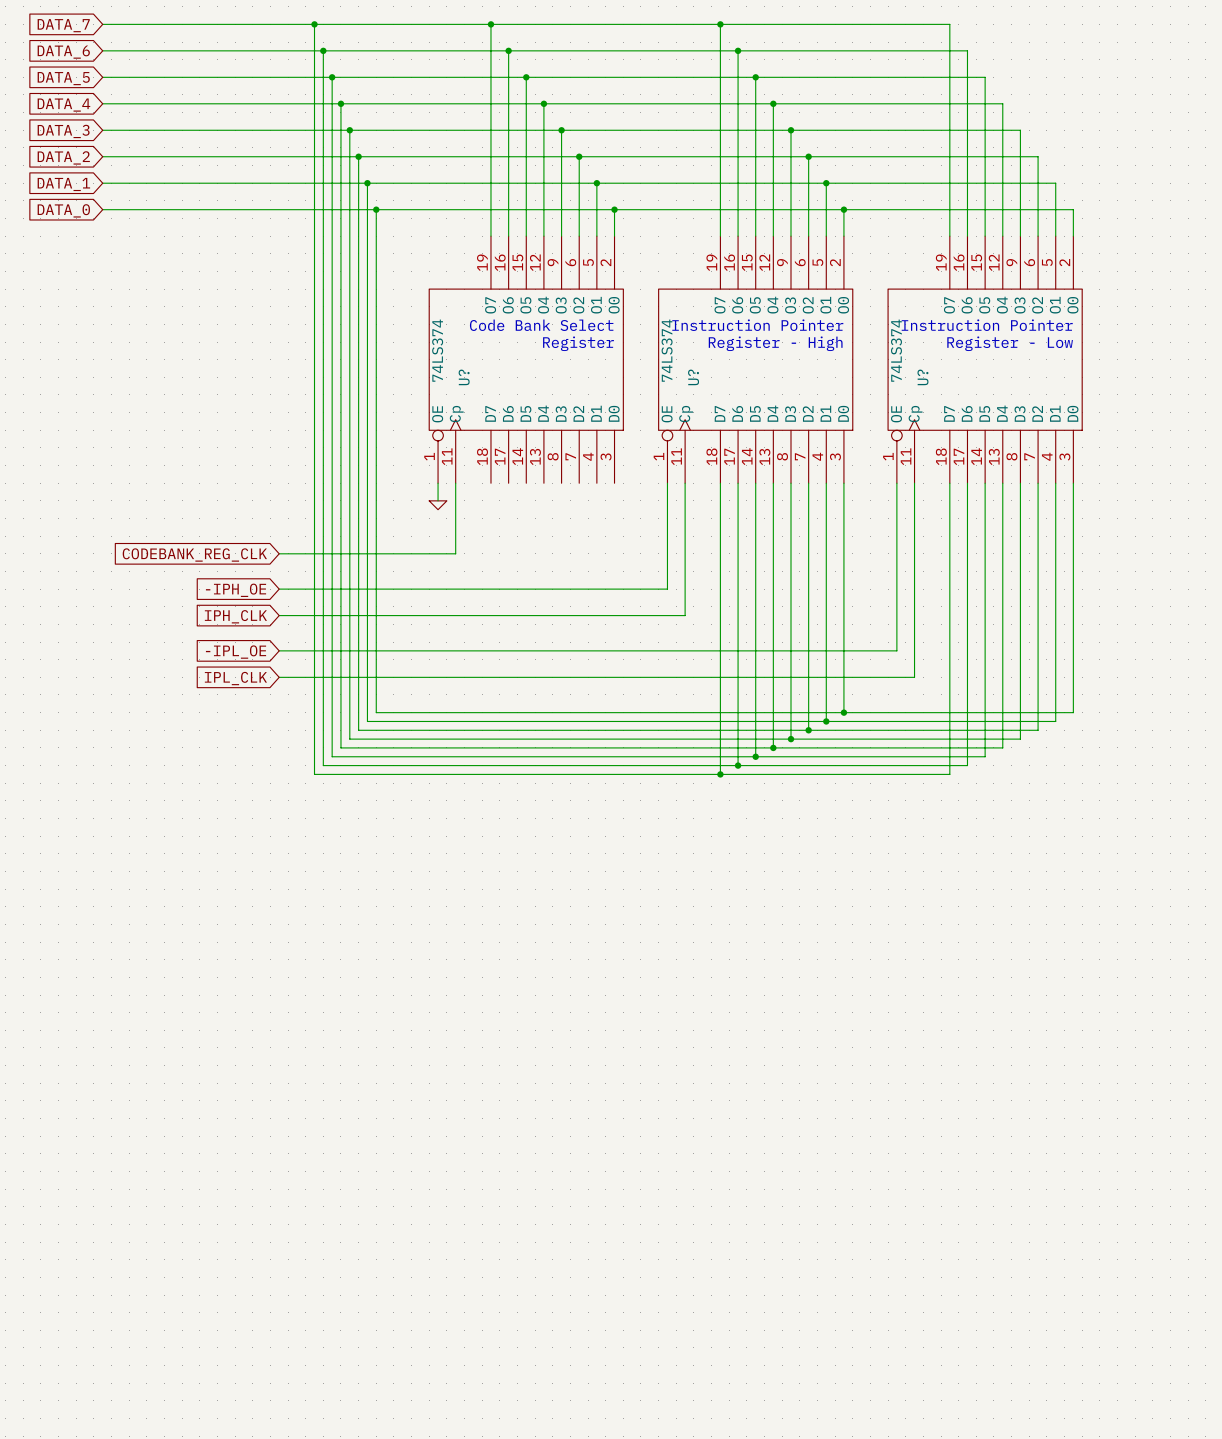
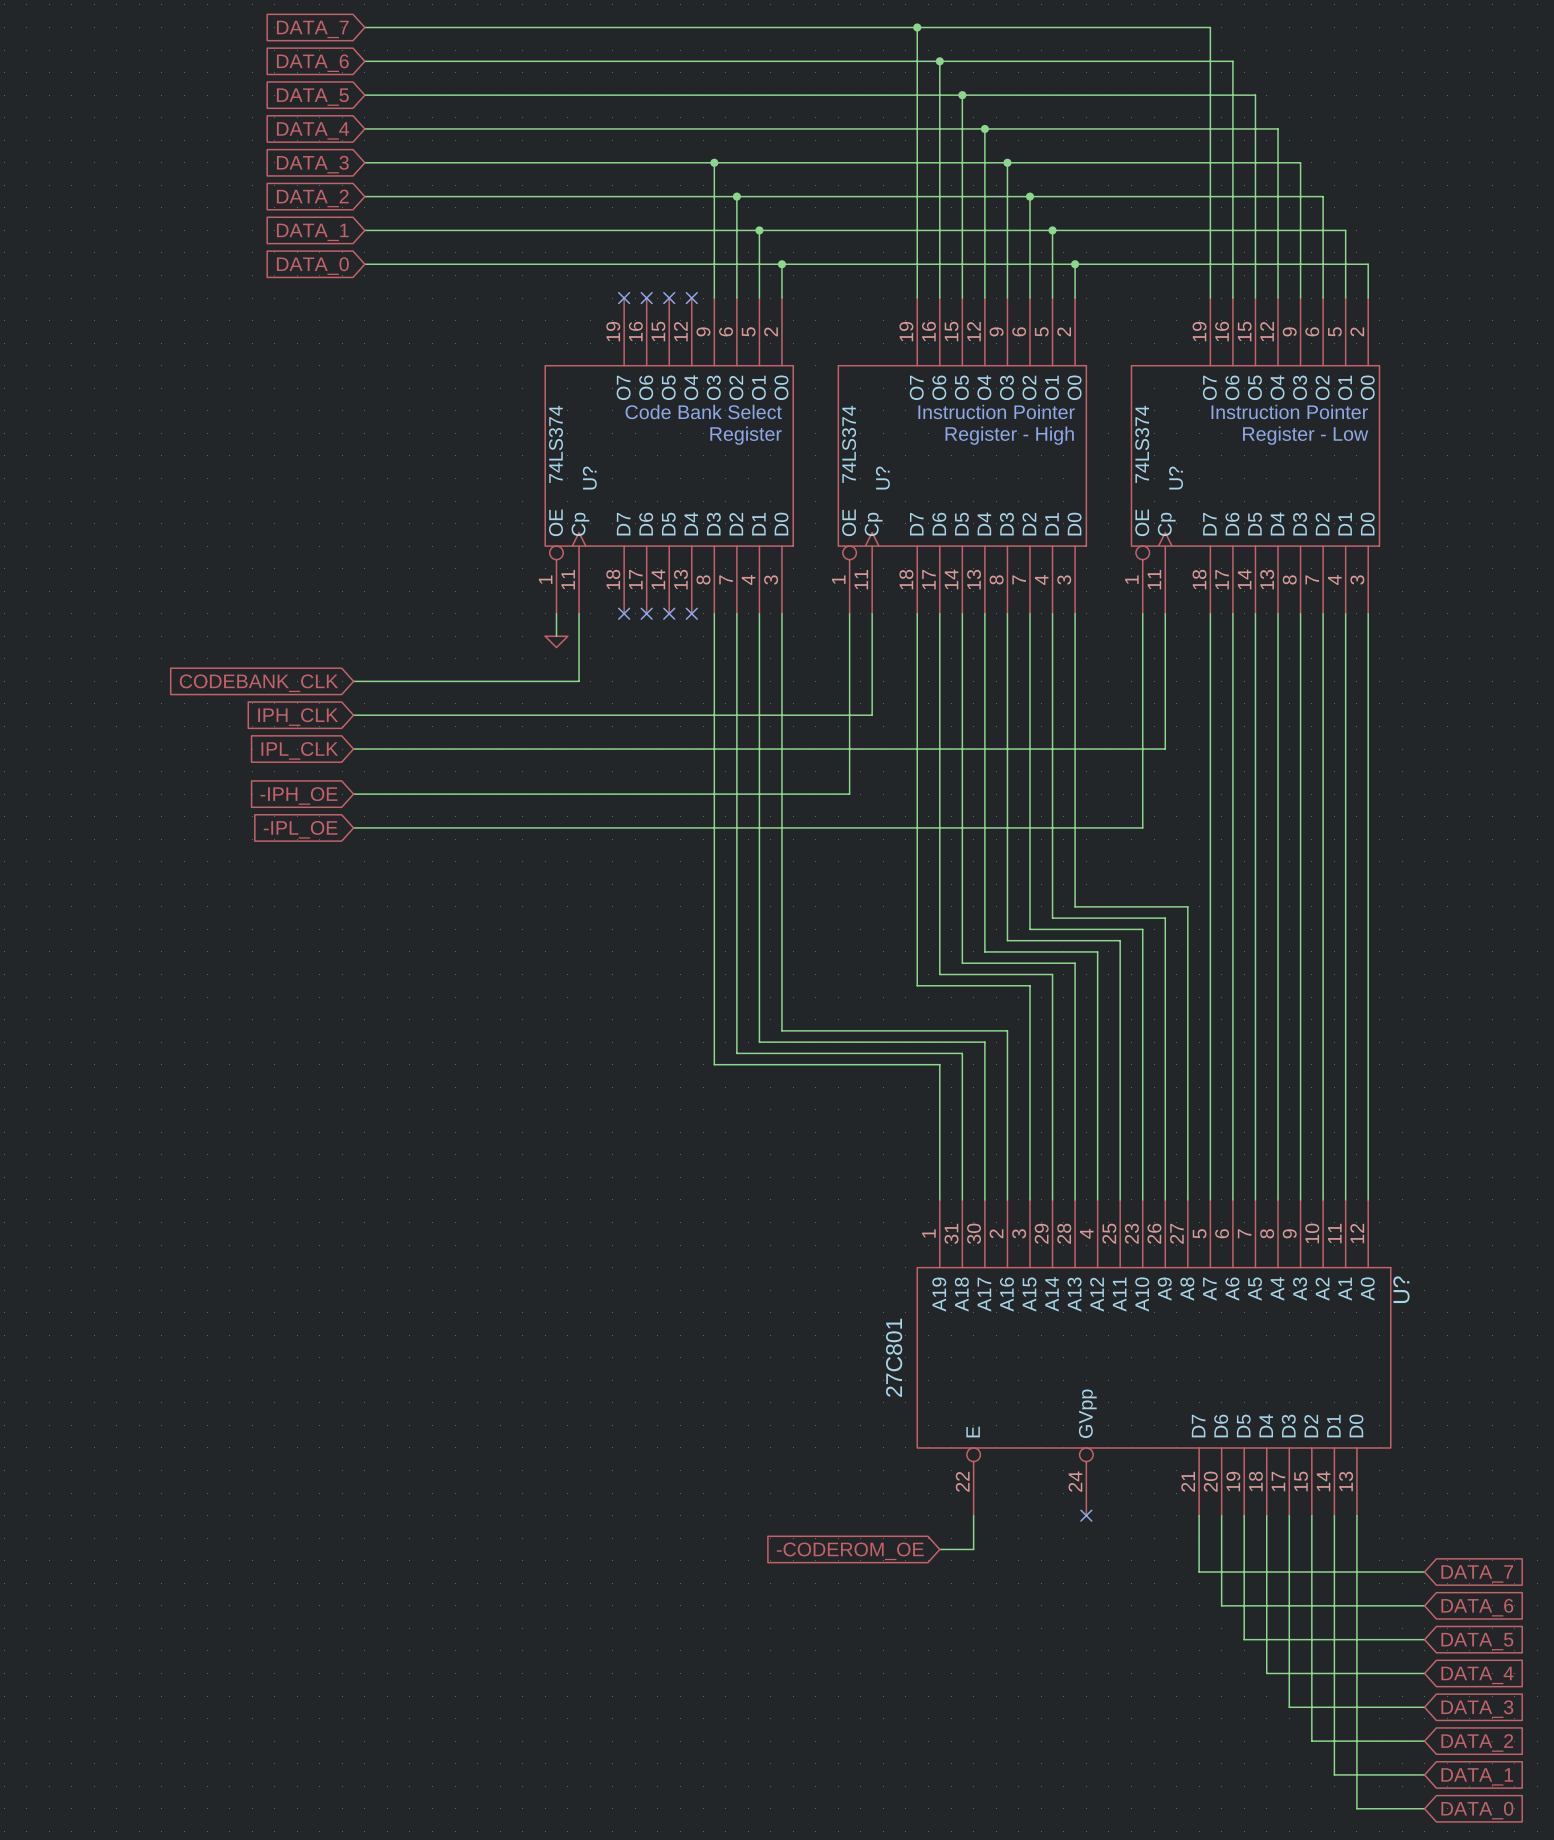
wire: (102, 24) (288, 24) -> none
wire: (314, 24) (314, 774) (720, 774) -> none
junction: (314, 24) -> none
wire: (490, 24) (490, 236) -> none
junction: (490, 24) -> none
global label: DATA_7 (63, 25) -> none
global label: none -> DATA_7 (312, 29)
wire: (102, 50) (288, 50) -> none
wire: (323, 50) (323, 765) (738, 765) -> none
junction: (323, 50) -> none
wire: (508, 50) (508, 236) -> none
junction: (508, 50) -> none
global label: DATA_6 (63, 52) -> none
global label: none -> DATA_6 (312, 63)
wire: (102, 77) (288, 77) -> none
wire: (332, 77) (332, 756) (755, 756) -> none
junction: (332, 77) -> none
wire: (526, 77) (526, 236) -> none
junction: (526, 77) -> none
global label: DATA_5 (63, 78) -> none
global label: none -> DATA_5 (312, 97)
wire: (102, 103) (288, 103) -> none
wire: (340, 103) (340, 747) (773, 747) -> none
junction: (340, 103) -> none
wire: (543, 103) (543, 236) -> none
junction: (543, 103) -> none
global label: DATA_4 (63, 105) -> none
global label: none -> DATA_4 (312, 130)
wire: (102, 130) (288, 130) -> none
wire: (349, 130) (349, 739) (791, 739) -> none
junction: (349, 130) -> none
global label: DATA_3 (63, 131) -> none
global label: none -> DATA_3 (312, 164)
wire: (102, 156) (288, 156) -> none
wire: (358, 156) (358, 730) (808, 730) -> none
junction: (358, 156) -> none
global label: DATA_2 (63, 157) -> none
global label: none -> DATA_2 (312, 198)
wire: (102, 183) (288, 183) -> none
wire: (367, 183) (367, 721) (826, 721) -> none
junction: (367, 183) -> none
global label: DATA_1 (63, 184) -> none
global label: none -> DATA_1 (312, 232)
wire: (102, 209) (288, 209) -> none
wire: (376, 209) (376, 712) (843, 712) -> none
junction: (376, 209) -> none
global label: DATA_0 (63, 210) -> none
global label: none -> DATA_0 (312, 266)
no-connect mark: none -> (624, 298)
no-connect mark: none -> (646, 298)
no-connect mark: none -> (669, 298)
no-connect mark: none -> (691, 298)
no-connect mark: none -> (624, 613)
no-connect mark: none -> (646, 613)
no-connect mark: none -> (669, 613)
no-connect mark: none -> (691, 613)
wire: none -> (714, 613) (714, 1064) (939, 1064) (939, 1199)
wire: none -> (736, 613) (736, 1053) (962, 1053) (962, 1199)
wire: none -> (759, 613) (759, 1042) (984, 1042) (984, 1199)
wire: none -> (781, 613) (781, 1030) (1007, 1030) (1007, 1199)
wire: (455, 536) (455, 553) (279, 553) -> (579, 681) (353, 681)
global label: CODEBANK_REG_CLK (194, 555) -> CODEBANK_CLK (258, 683)
wire: (685, 562) (685, 615) (279, 615) -> (872, 715) (353, 715)
wire: (914, 589) (914, 677) (279, 677) -> (1165, 749) (849, 749) (849, 794) (353, 794)
global label: -IPH_OE (236, 590) -> IPL_CLK (299, 750)
global label position: IPH_CLK (235, 616) -> IPH_CLK (298, 717)
global label: none -> -IPH_OE (299, 795)
global label: IPL_CLK (235, 678) -> none
junction: (843, 712) -> none
wire: (932, 712) (1073, 712) -> (1187, 906) (1187, 1199)
wire: none -> (1368, 906) (1368, 1199)
junction: (826, 721) -> none
wire: (914, 721) (1055, 721) -> (1165, 918) (1165, 1199)
wire: none -> (1345, 918) (1345, 1199)
junction: (808, 730) -> none
wire: (896, 730) (1038, 730) -> (1142, 929) (1142, 1199)
wire: none -> (1323, 929) (1323, 1199)
junction: (791, 739) -> none
wire: (879, 739) (1020, 739) -> (1120, 940) (1120, 1199)
wire: none -> (1300, 940) (1300, 1199)
junction: (773, 747) -> none
wire: (861, 747) (1002, 747) -> (1097, 951) (1097, 1199)
wire: none -> (1278, 951) (1278, 1199)
junction: (755, 756) -> none
wire: (843, 756) (985, 756) -> (1075, 963) (1075, 1199)
wire: none -> (1255, 963) (1255, 1199)
junction: (738, 765) -> none
wire: (826, 765) (967, 765) -> (1052, 974) (1052, 1199)
wire: none -> (1232, 974) (1232, 1199)
junction: (720, 774) -> none
wire: (808, 774) (949, 774) -> (1029, 985) (1029, 1199)
wire: none -> (1210, 985) (1210, 1199)
U?: none -> 27C801 (1154, 1357)
wire: none -> (973, 1515) (973, 1549) (939, 1549)
no-connect mark: none -> (1086, 1515)
wire: none -> (1199, 1515) (1199, 1572) (1424, 1572)
wire: none -> (1221, 1515) (1221, 1605) (1424, 1605)
wire: none -> (1244, 1515) (1244, 1639) (1424, 1639)
wire: none -> (1266, 1515) (1266, 1673) (1424, 1673)
wire: none -> (1289, 1515) (1289, 1707) (1424, 1707)
wire: none -> (1311, 1515) (1311, 1741) (1424, 1741)
wire: none -> (1334, 1515) (1334, 1774) (1424, 1774)
wire: none -> (1356, 1515) (1356, 1808) (1424, 1808)
global label: none -> -CODEROM_OE (850, 1551)
global label: none -> DATA_7 (1477, 1573)
global label: none -> DATA_6 (1477, 1607)
global label: none -> DATA_5 (1477, 1641)
global label: none -> DATA_4 (1477, 1675)
global label: none -> DATA_3 (1477, 1709)
global label: none -> DATA_2 (1477, 1742)
global label: none -> DATA_1 (1477, 1776)
global label: none -> DATA_0 (1477, 1810)

